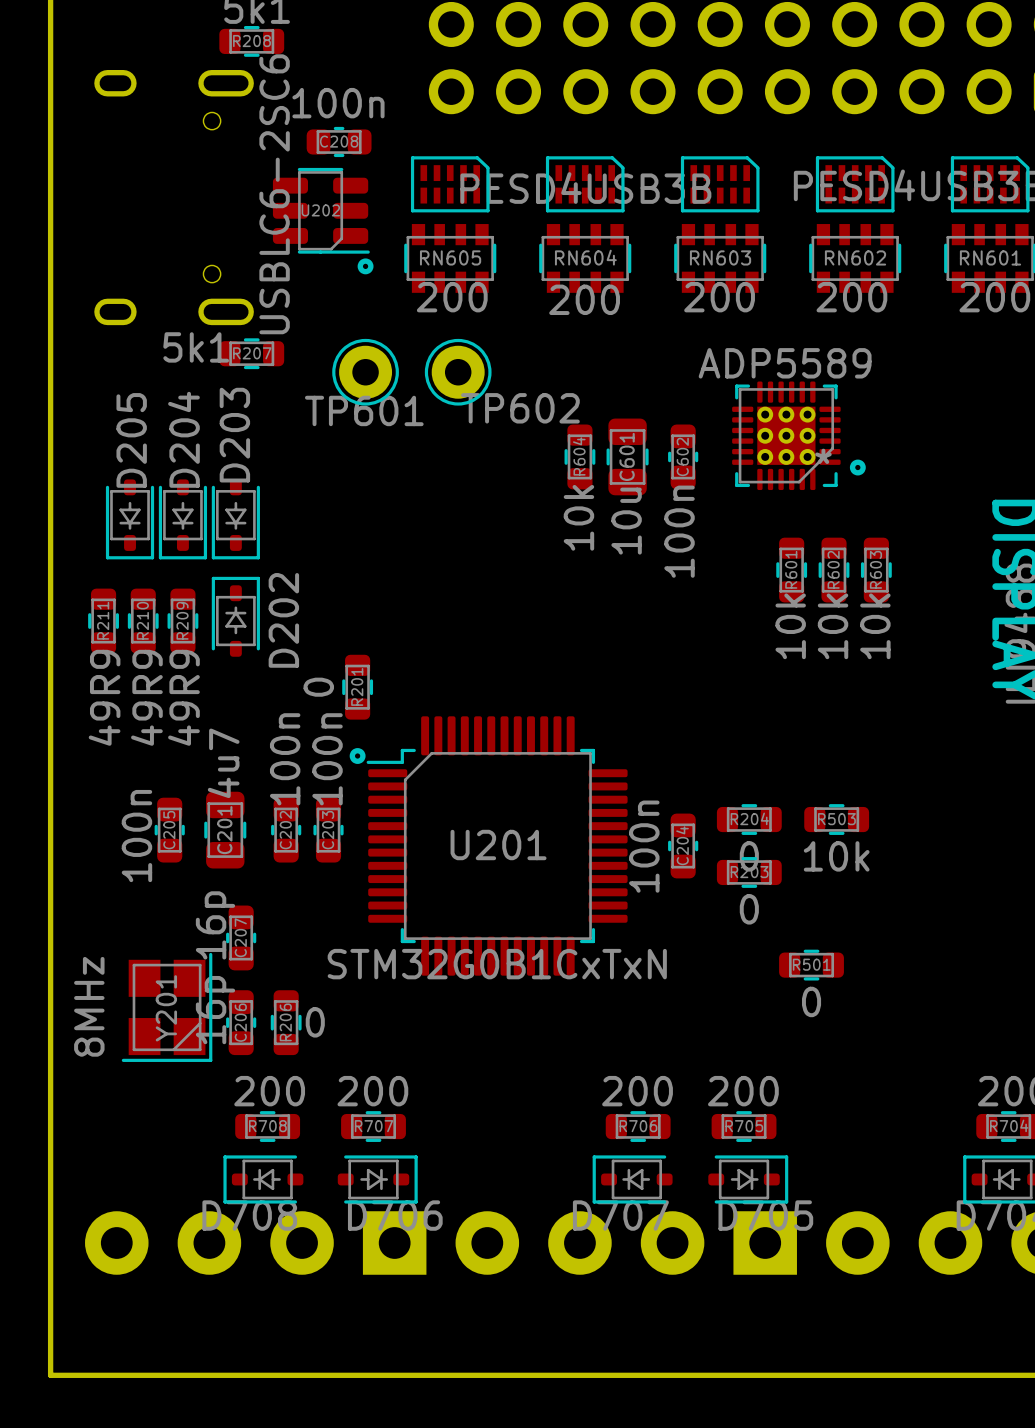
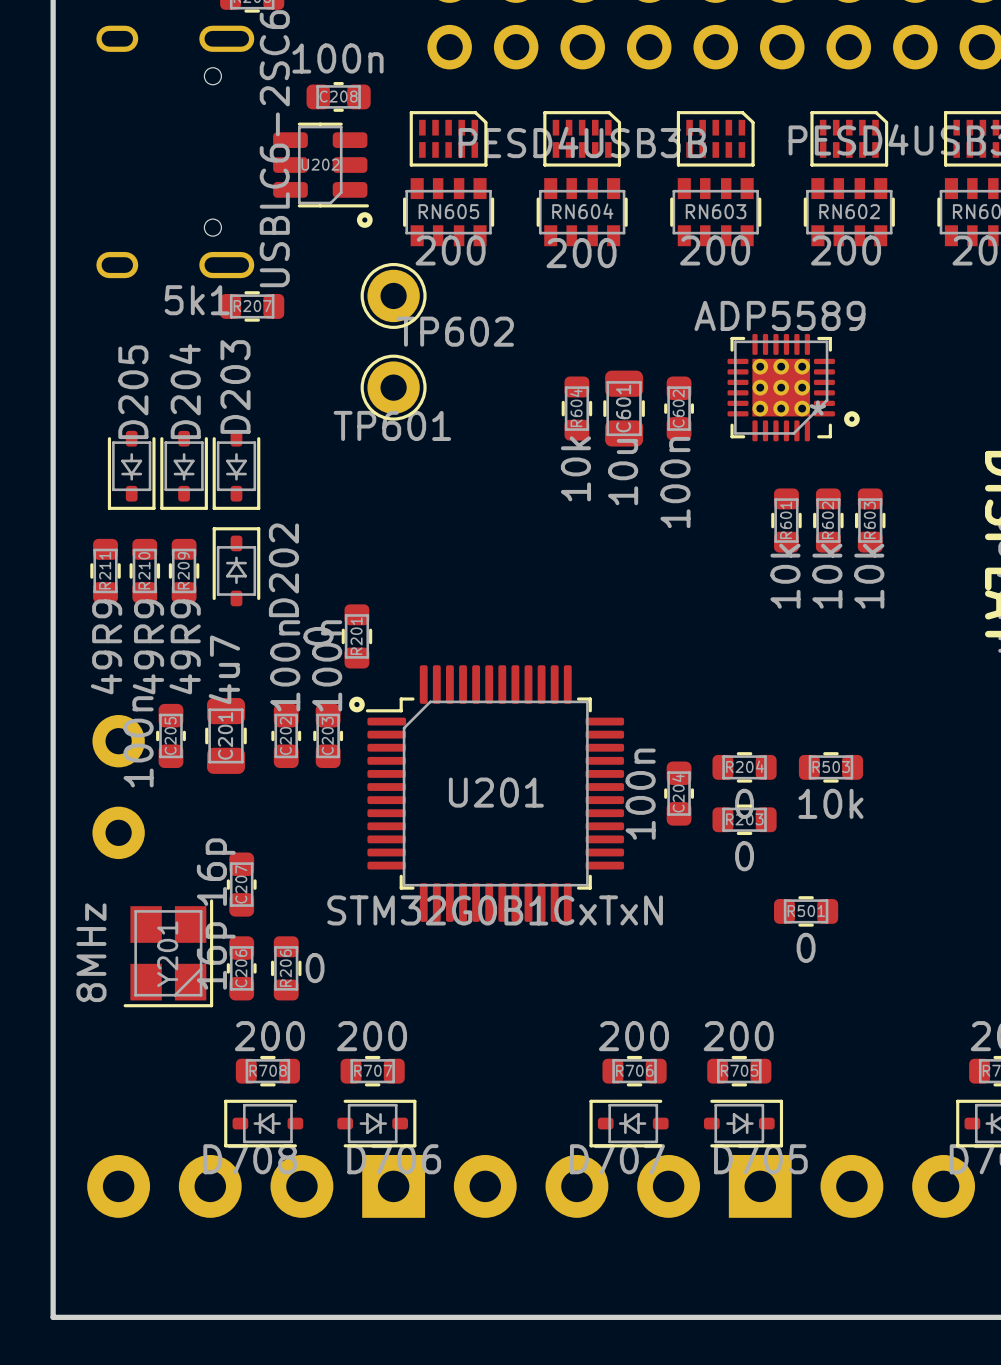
TP601 position: (365, 372) -> (393, 387)
TP602 position: (458, 372) -> (393, 295)
part: none -> (118, 741)
C205 position: (169, 830) -> (171, 735)
C201 position: (225, 830) -> (226, 735)
C202 position: (286, 830) -> (286, 735)
C203 position: (328, 830) -> (328, 735)
part: none -> (118, 832)

